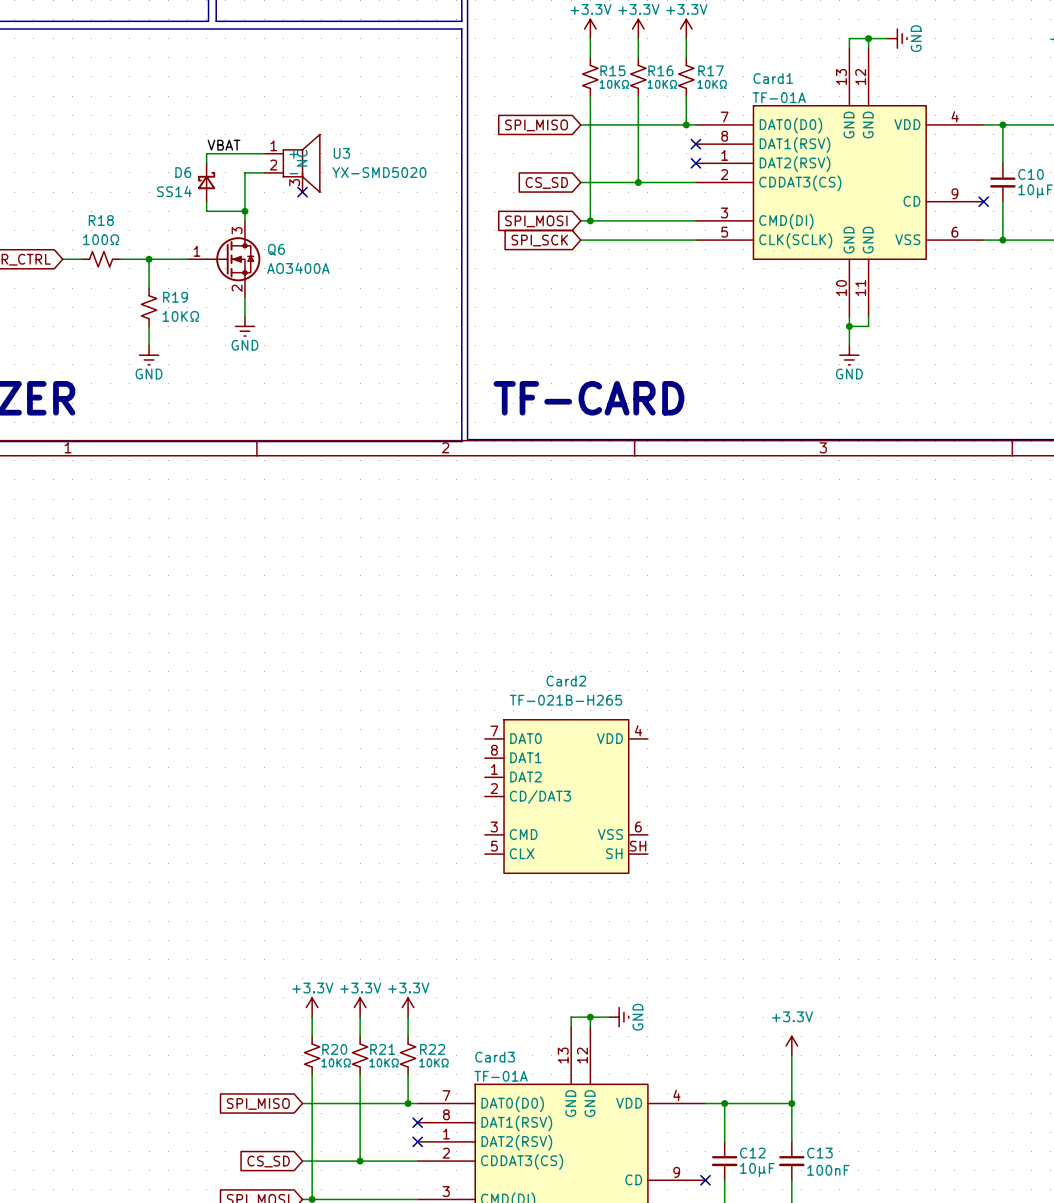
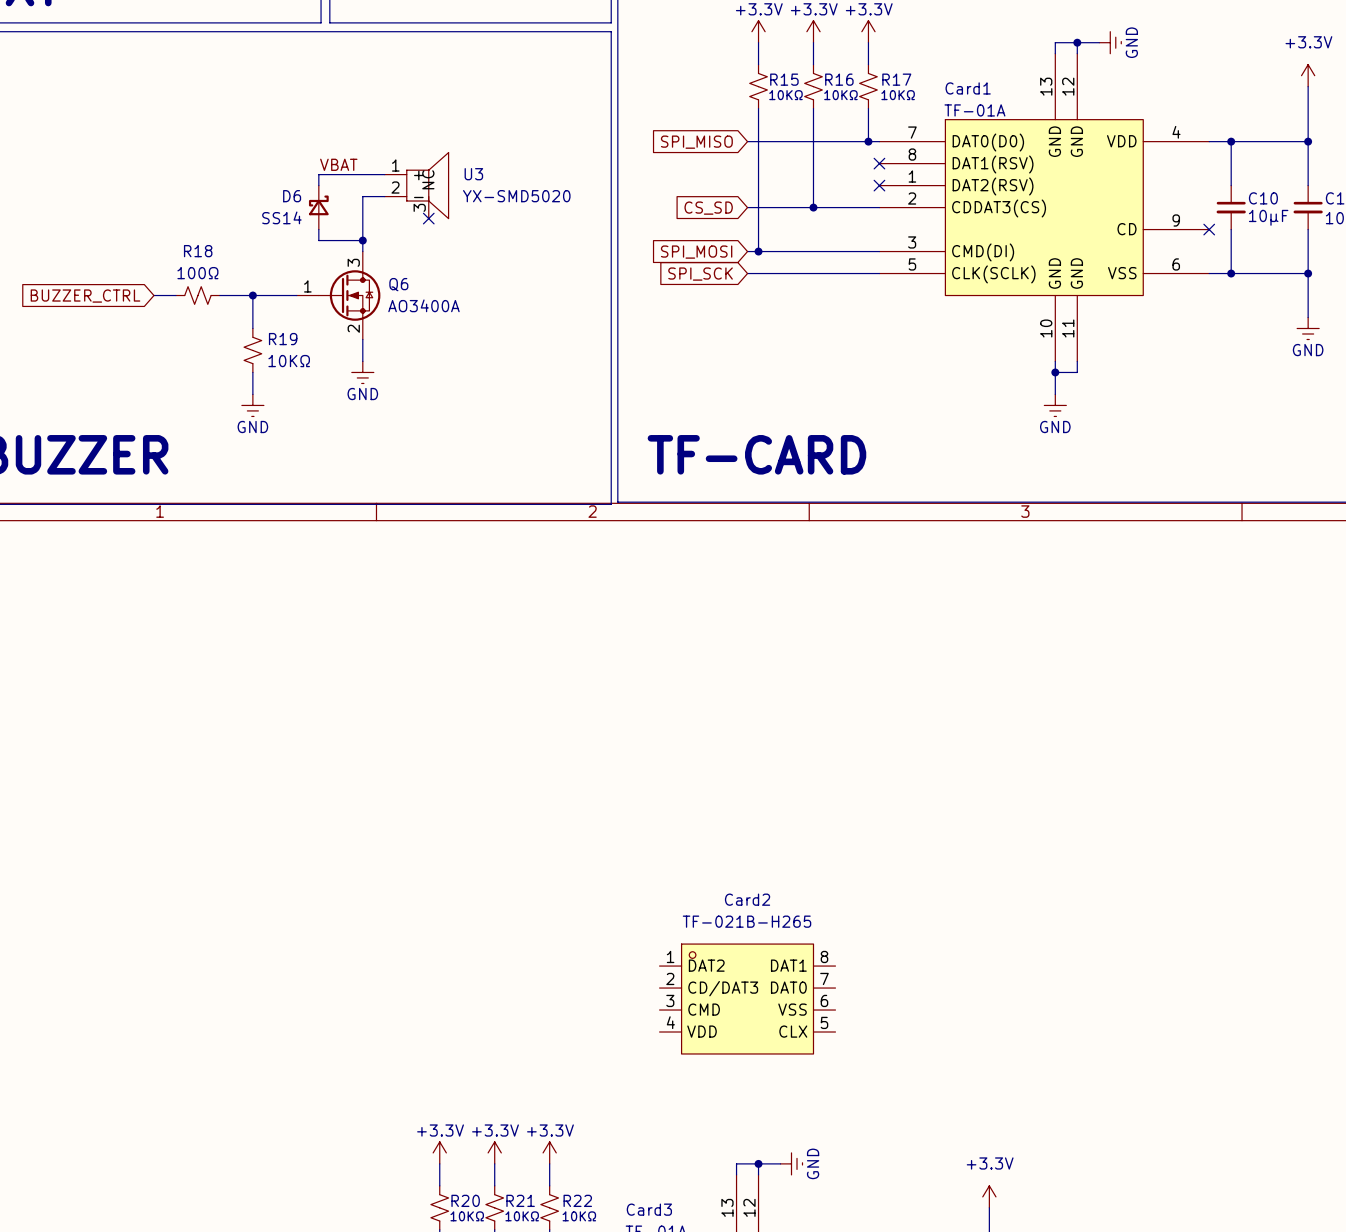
Card2 name position: Card2 (566, 681) -> Card2 (747, 899)
Card2 value position: TF-021B-H265 (565, 700) -> TF-021B-H265 (747, 921)
Card2 symbol: [484, 719, 648, 874] -> [659, 944, 836, 1054]

